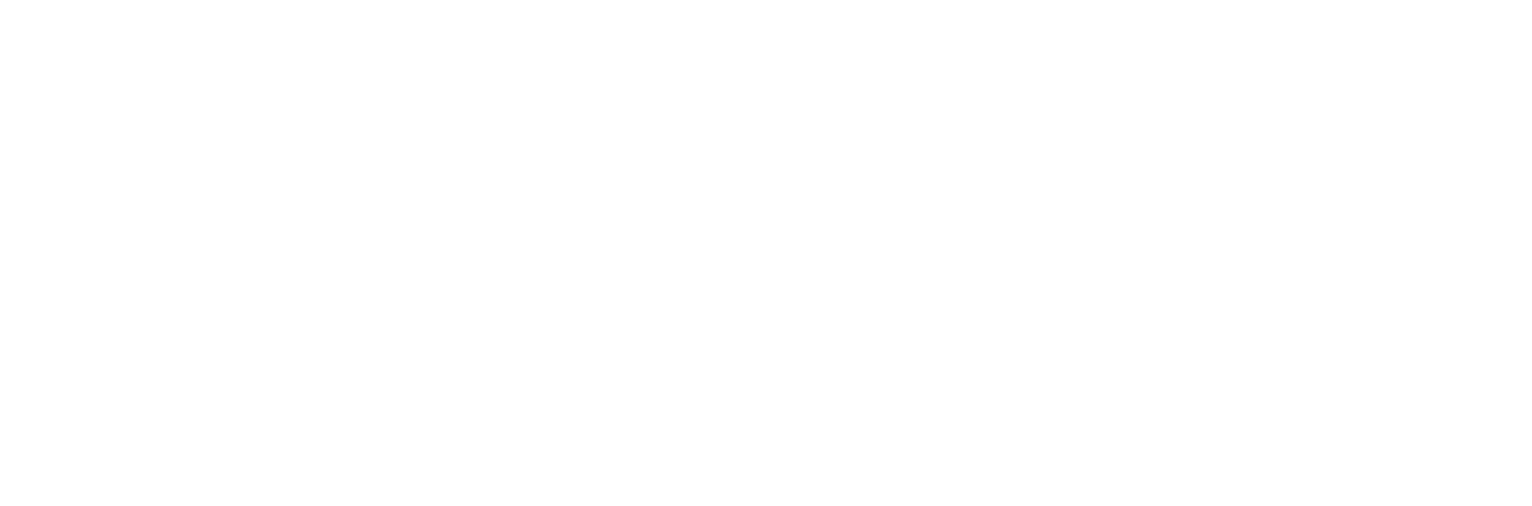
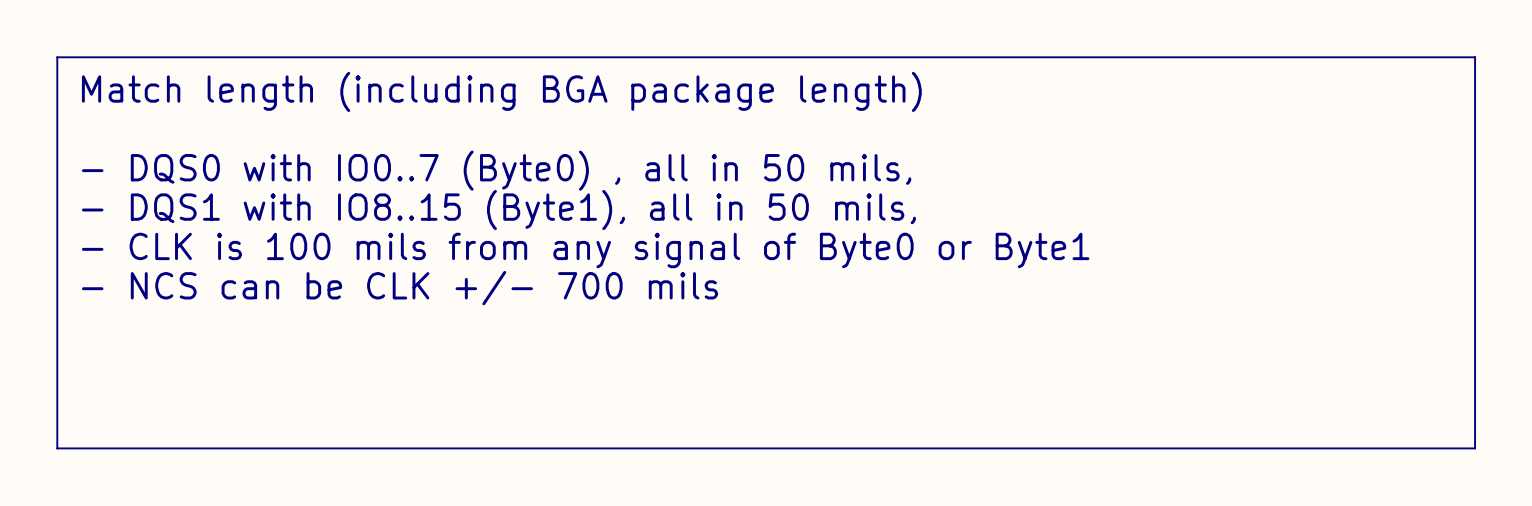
line: none -> (57, 57) (1475, 57) (1475, 448) (57, 448) (57, 57)
text: none -> Match length (including BGA package length) (501, 91)
text: none -> - DQS0 with IO0..7 (Byte0) , all in 50 mils, (496, 170)
text: none -> - DQS1 with IO8..15 (Byte1), all in 50 mils, (498, 209)
text: none -> - CLK is 100 mils from any signal of Byte0 or Byte1 (585, 250)
text: none -> - NCS can be CLK +/- 700 mils (399, 288)

